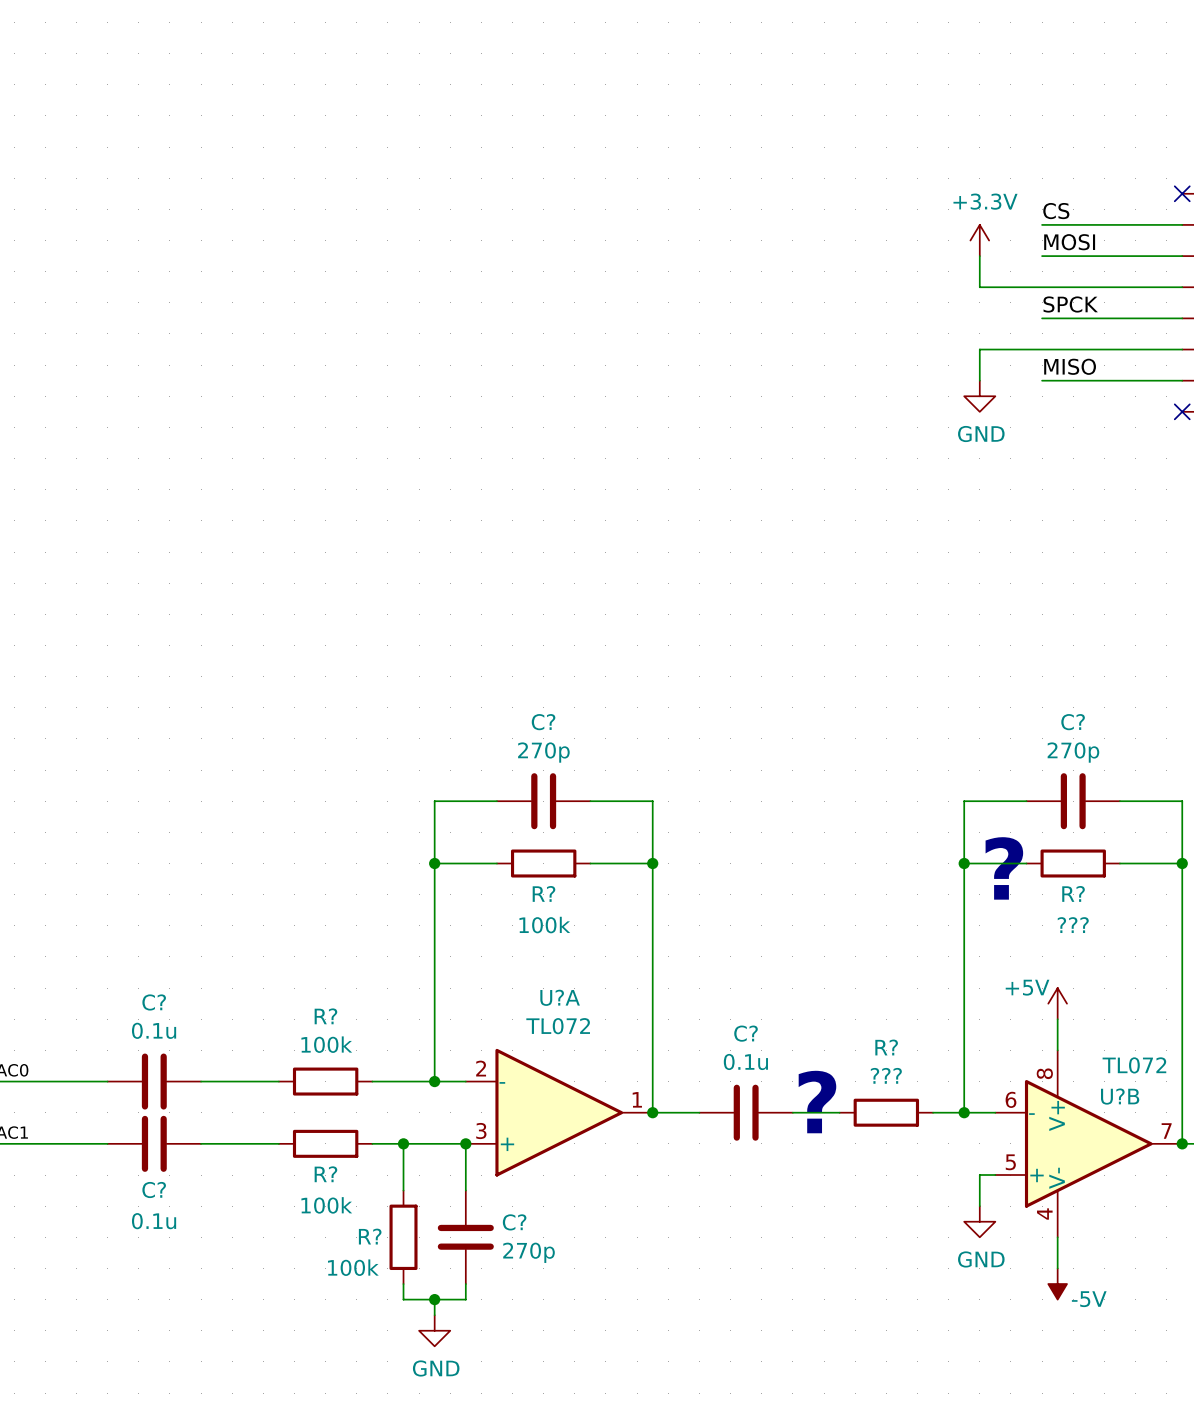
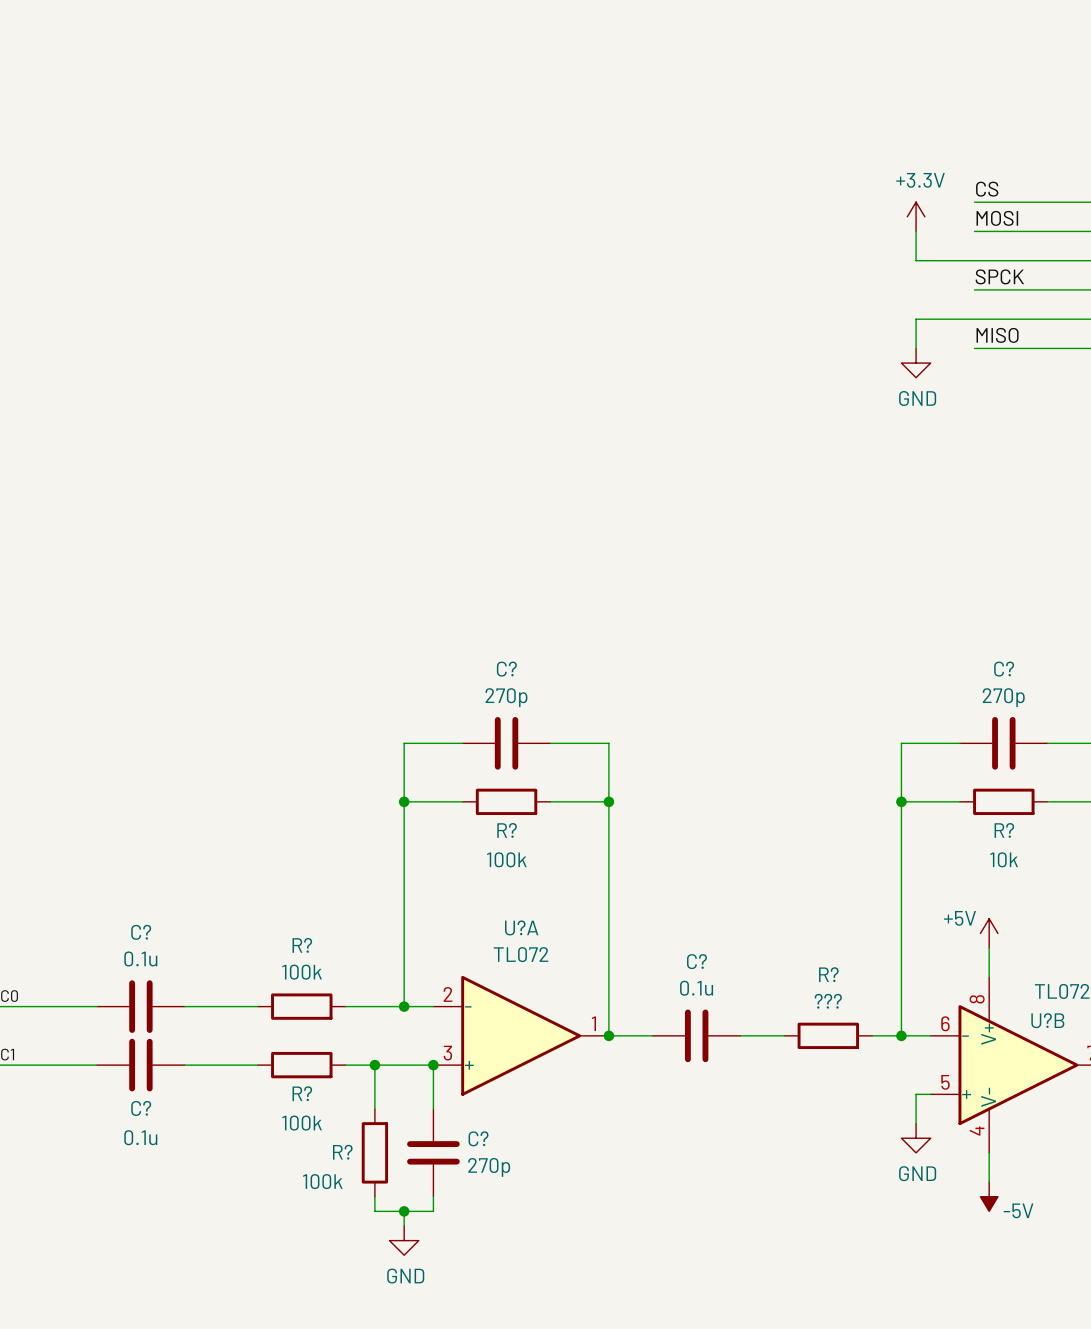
text: ? (1004, 868) -> none
R? value: ??? (1073, 925) -> 10k (1004, 859)
text: ? (817, 1102) -> none

